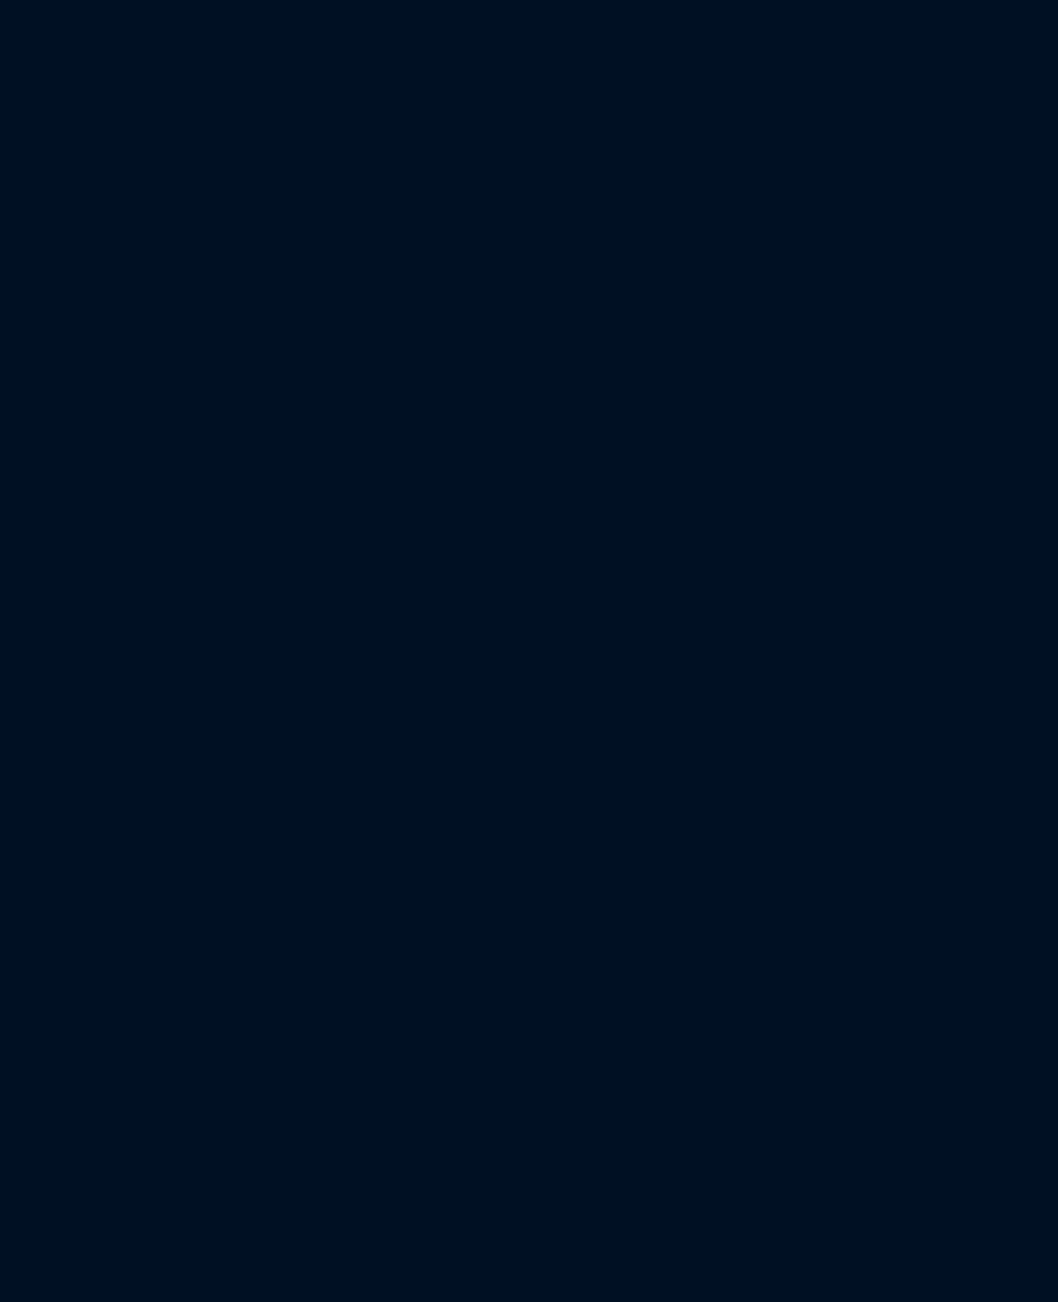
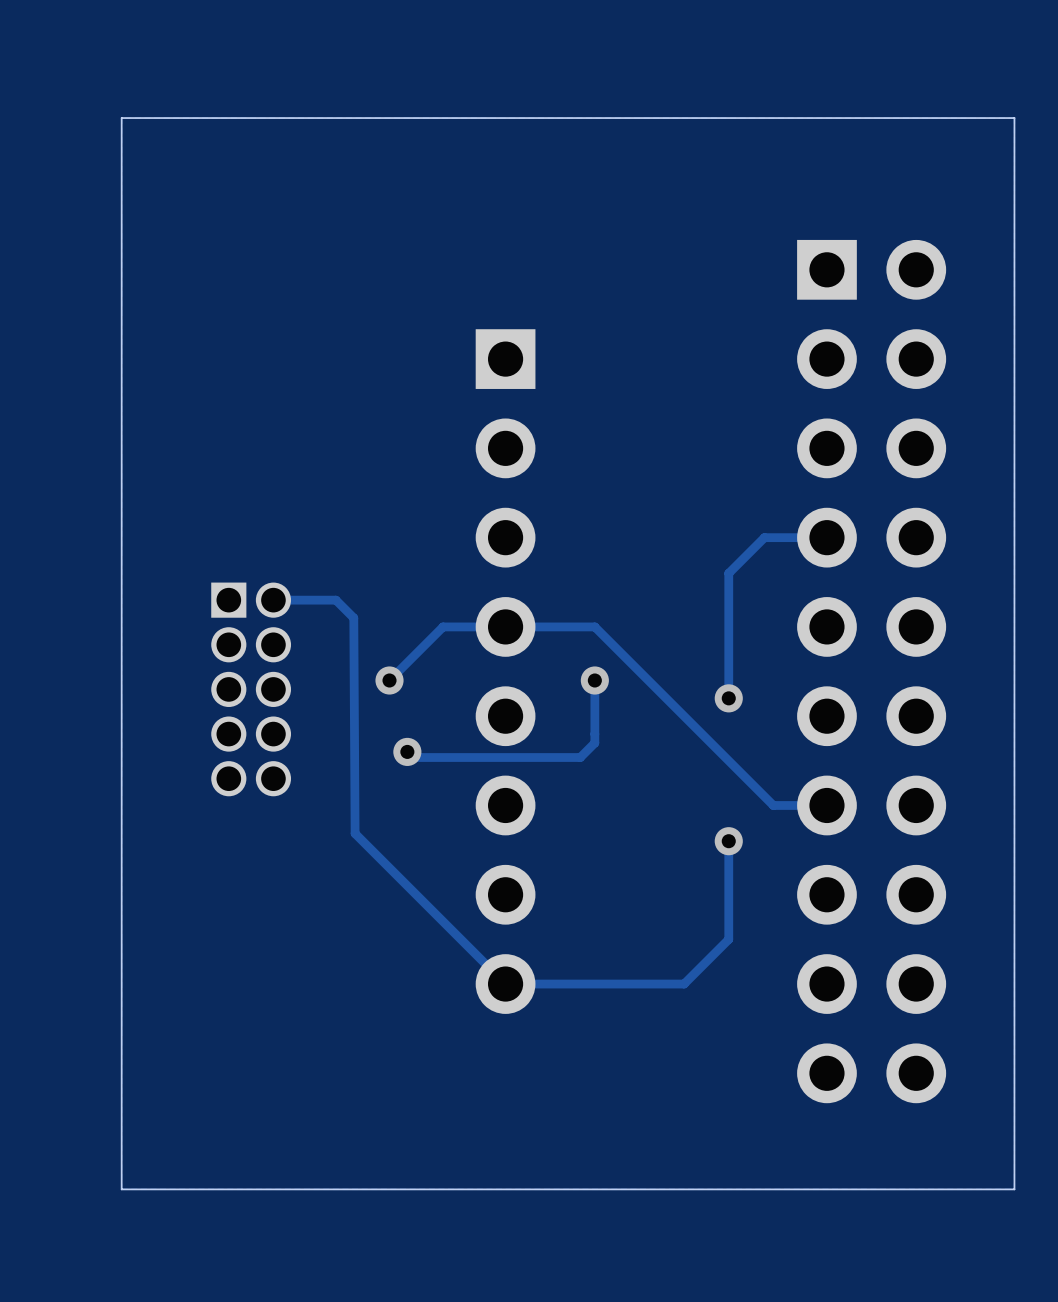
board edge: none -> (1014, 118) (1014, 1189) (121, 1189) (121, 118) (1014, 118)
track: none -> (826, 537) (764, 537) (728, 573) (728, 698)
track: none -> (273, 600) (335, 600) (353, 618) (355, 833) (505, 984) (684, 984) (728, 939) (728, 841)
part: none -> (505, 671)
part: none -> (871, 671)
track: none -> (389, 680) (443, 626) (594, 626) (773, 805) (826, 805)
via: none -> (389, 680)
track: none -> (594, 680) (594, 742) (580, 757) (412, 757) (407, 751)
via: none -> (594, 680)
part: none -> (251, 689)
via: none -> (728, 698)
via: none -> (407, 751)
via: none -> (728, 841)

